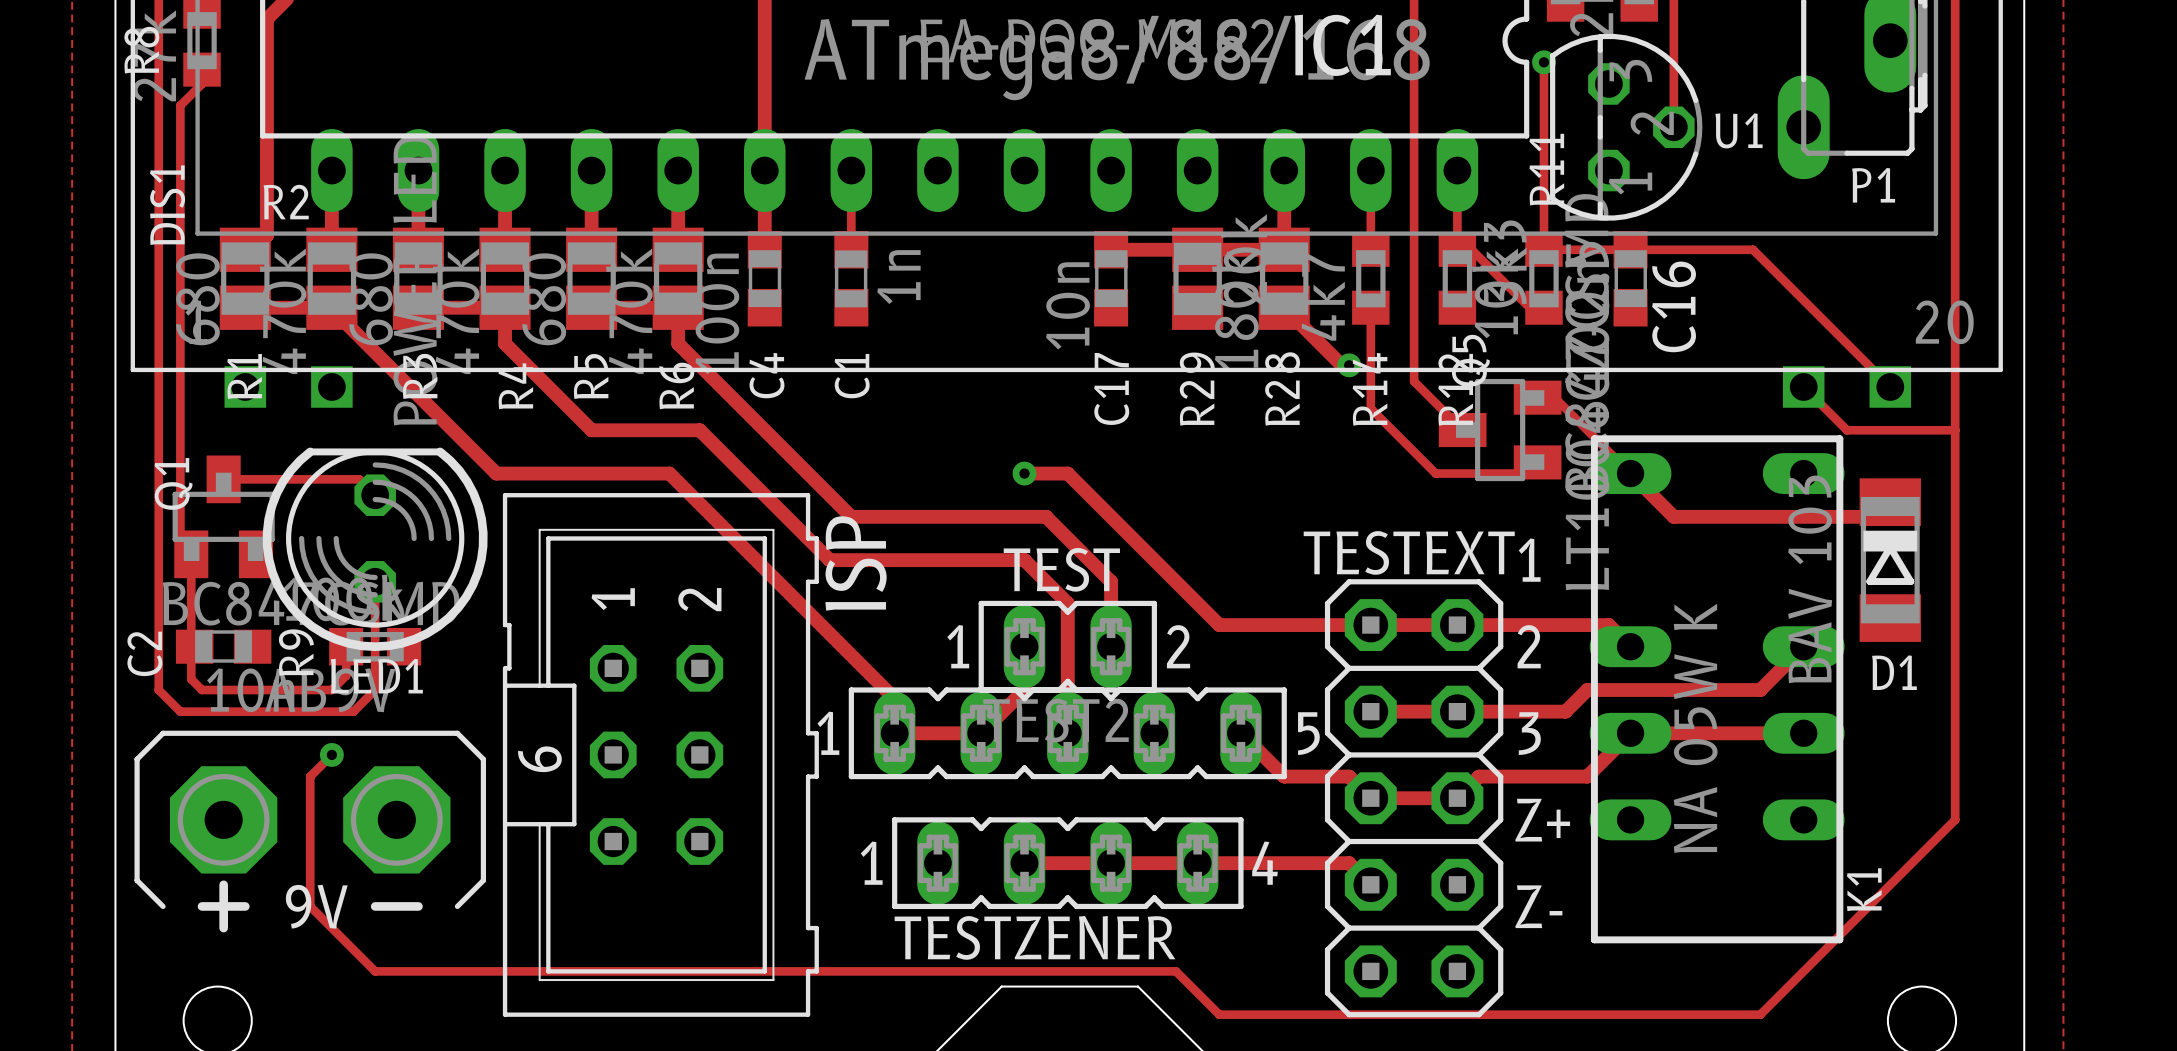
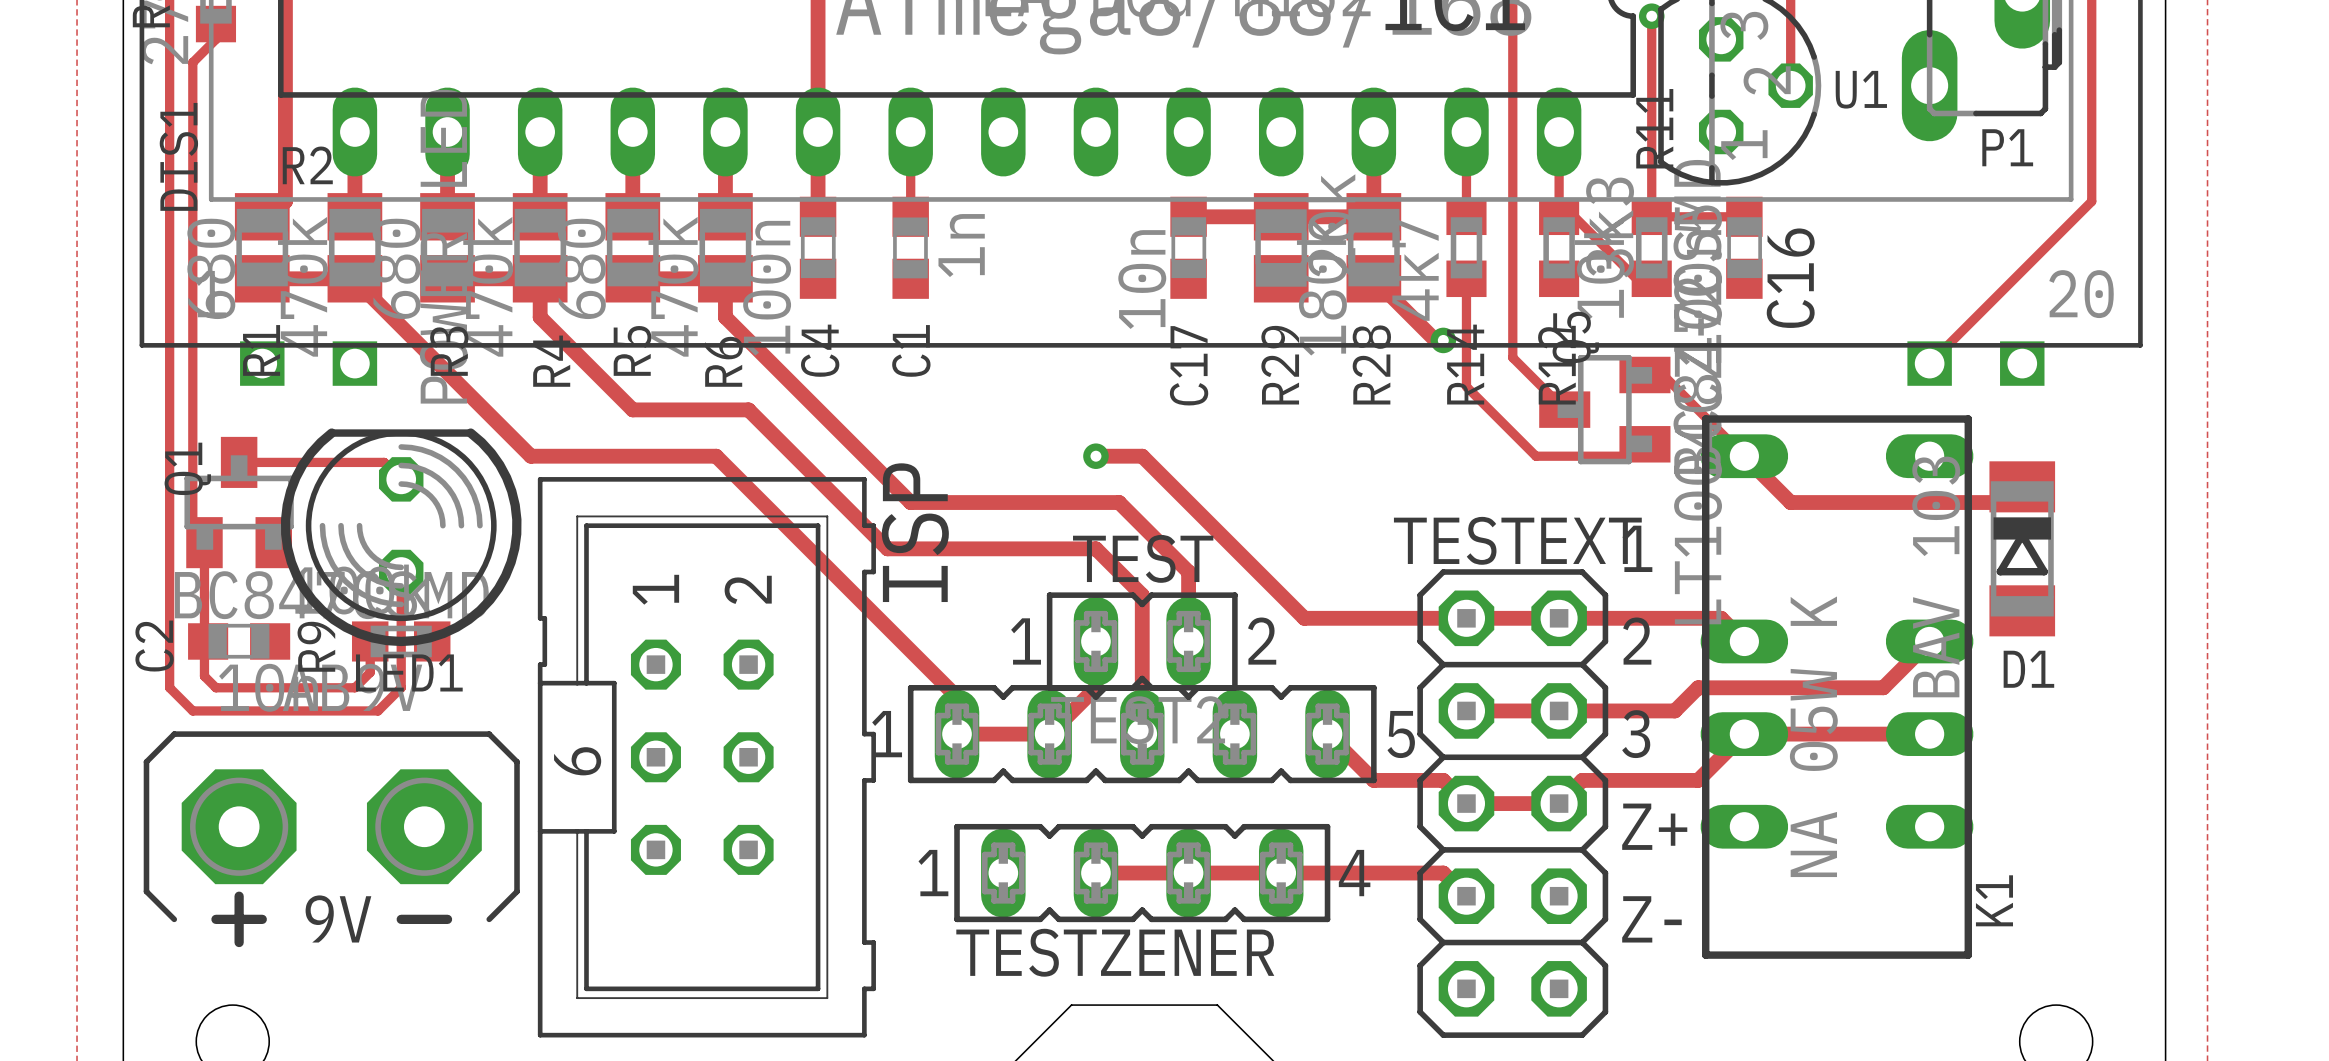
track: (1955, 235) (1955, 819) (1760, 1014) (1219, 1014) (1176, 971) (375, 971) (310, 906) (310, 776) (331, 754) -> none
track: (1630, 249) (1753, 249) (1890, 386) -> none
track: (1803, 386) (1847, 430) (1955, 430) -> (1929, 363) (2091, 201)
via: (331, 754) -> none

